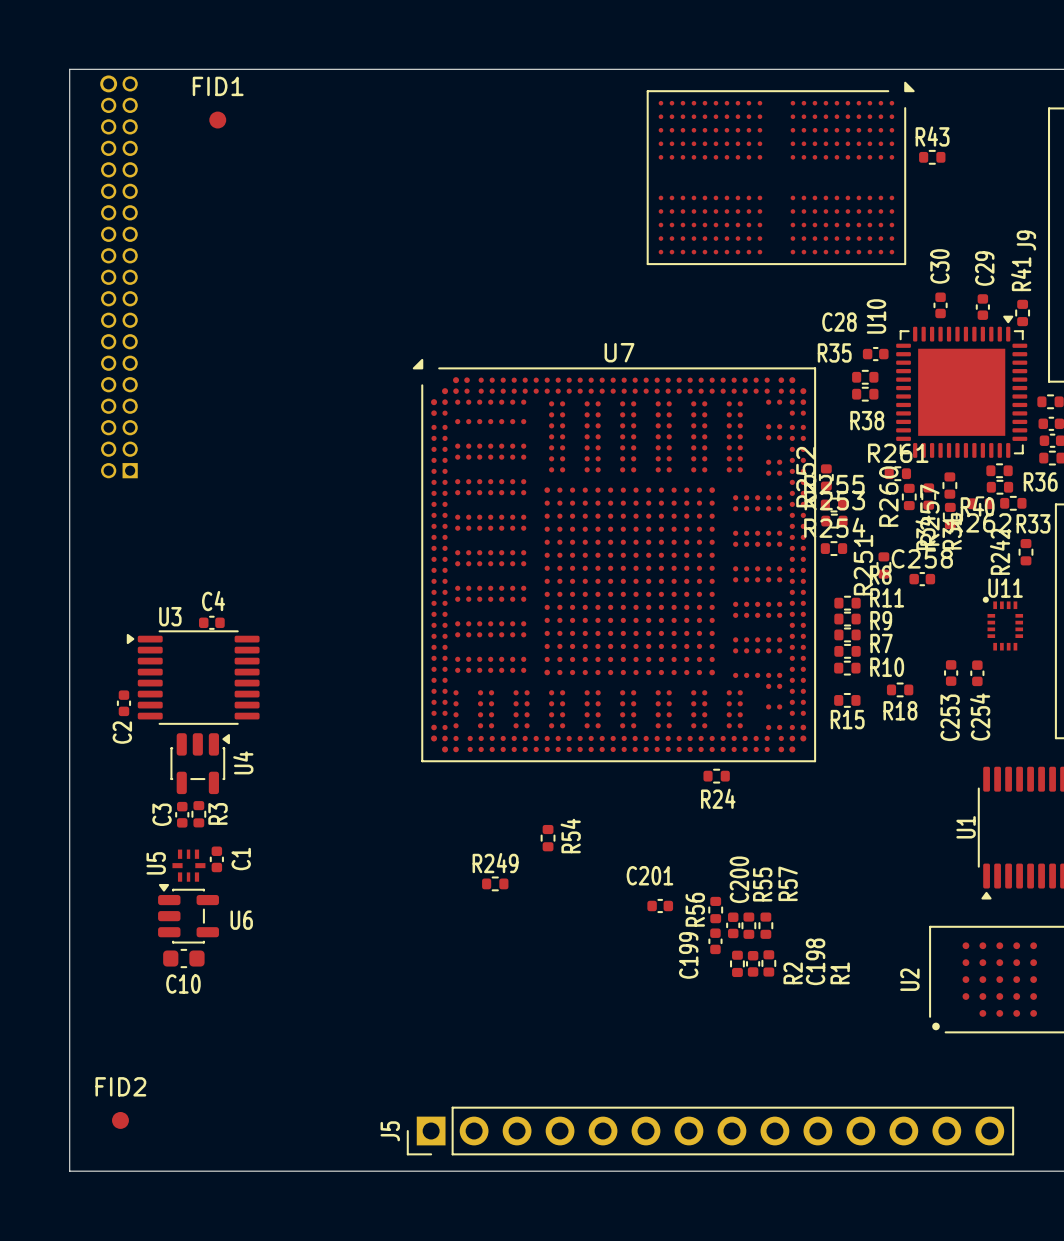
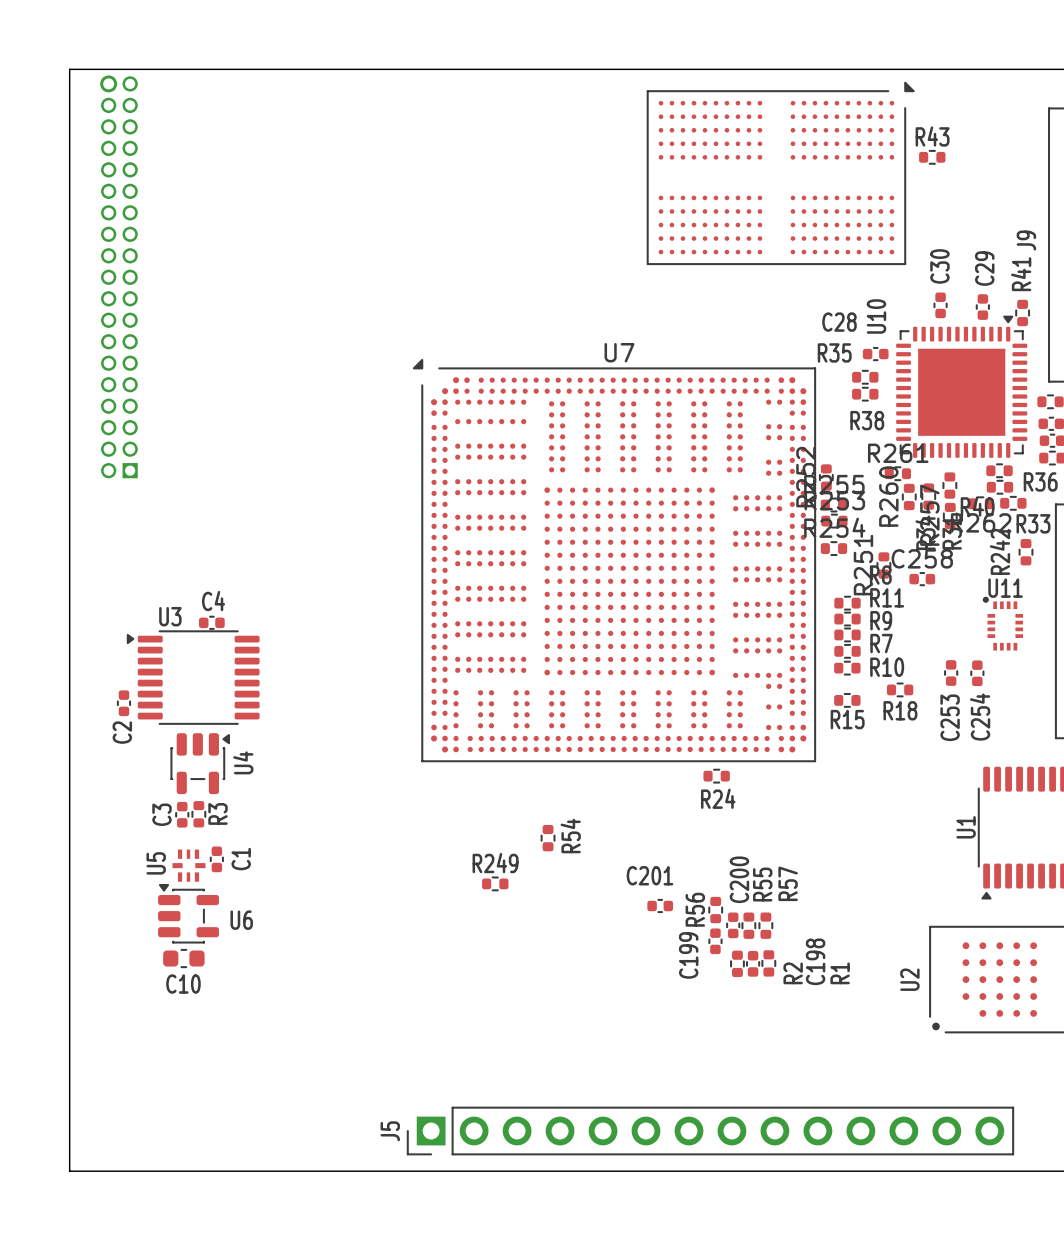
FID1: (217, 120) -> none
FID2: (120, 1120) -> none

